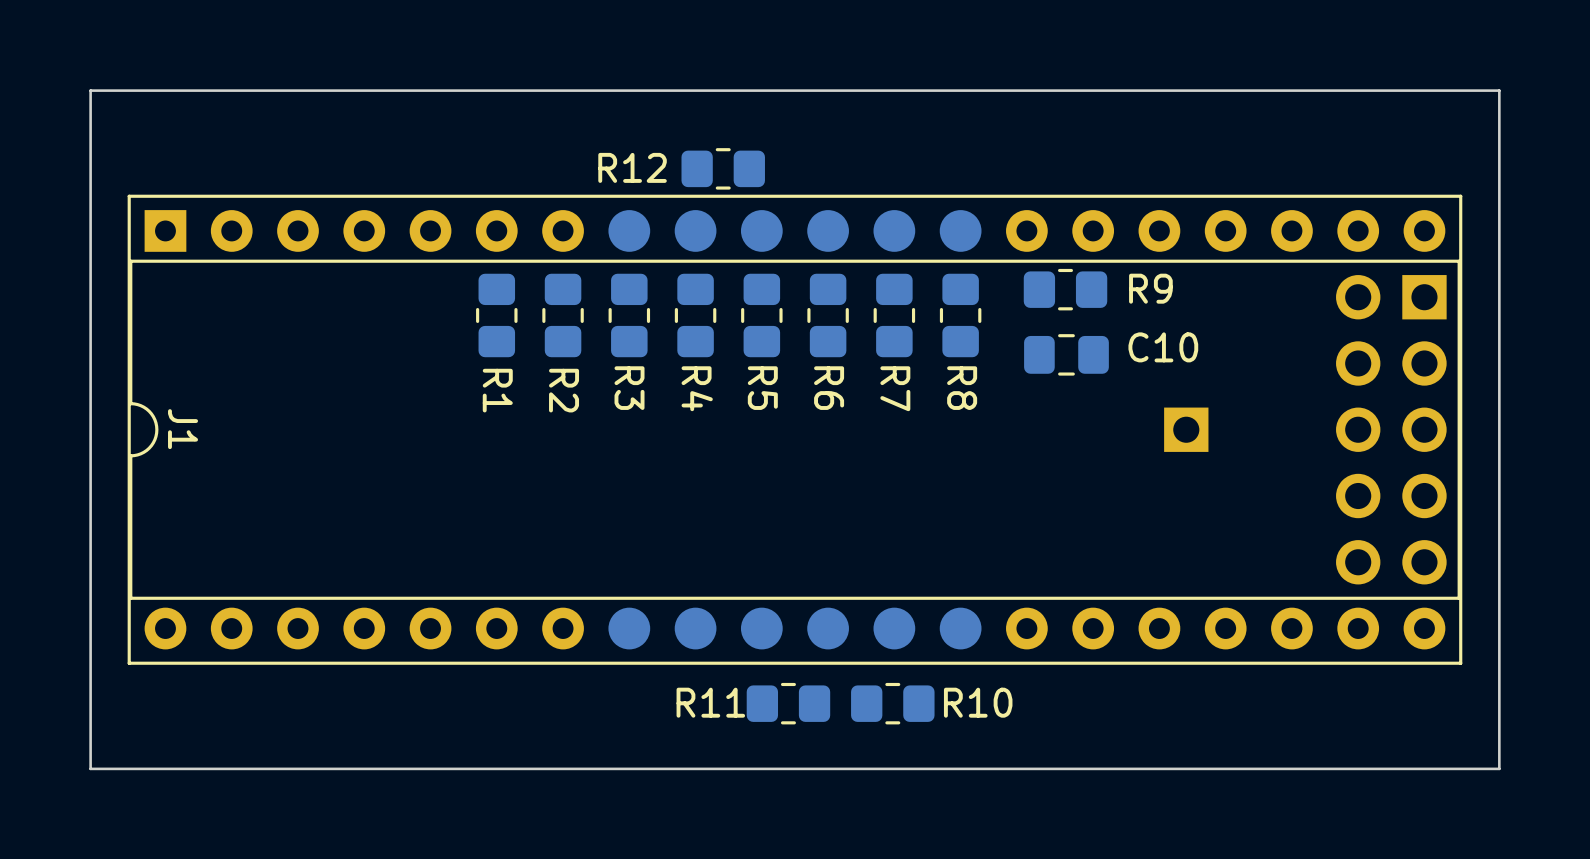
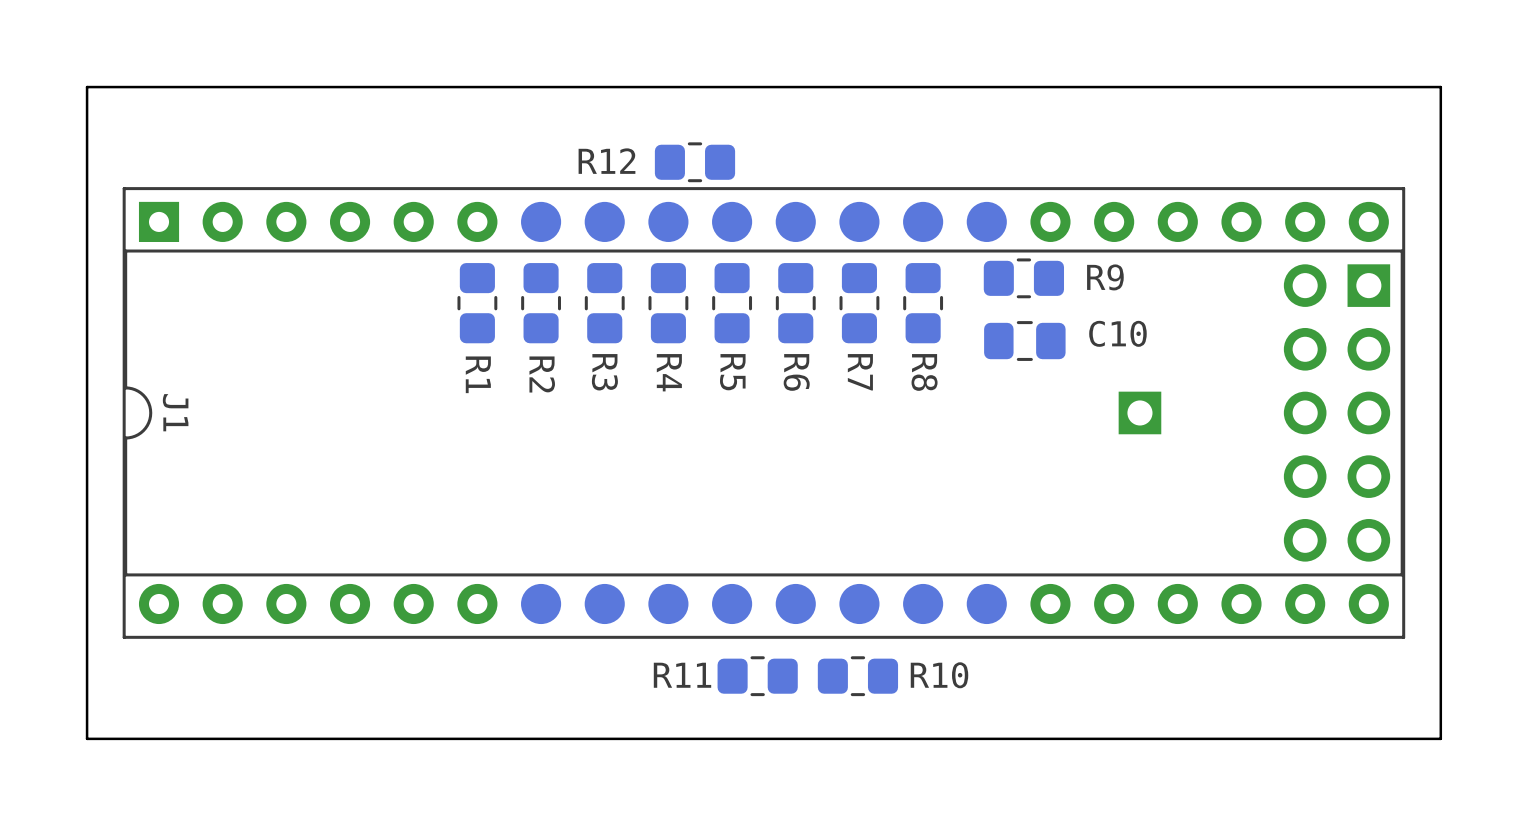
J1 footprint: [127, 194, 1463, 665] -> [122, 187, 1406, 639]

